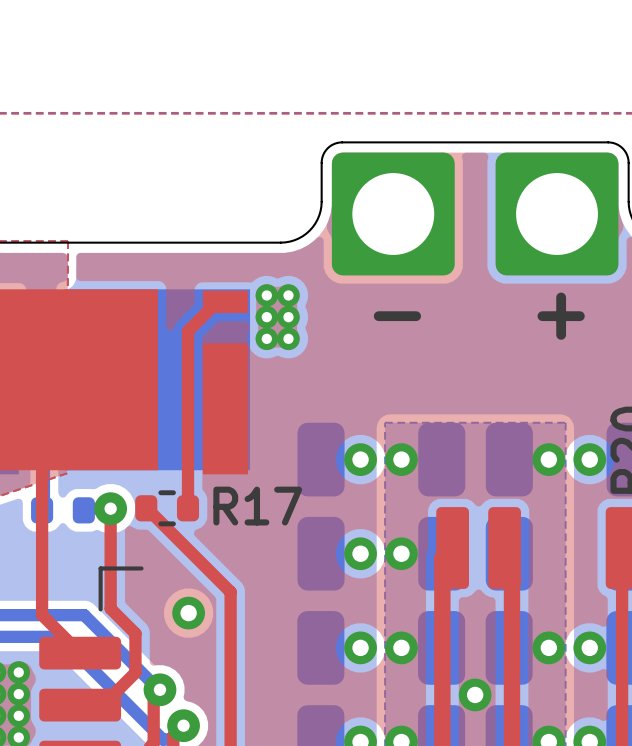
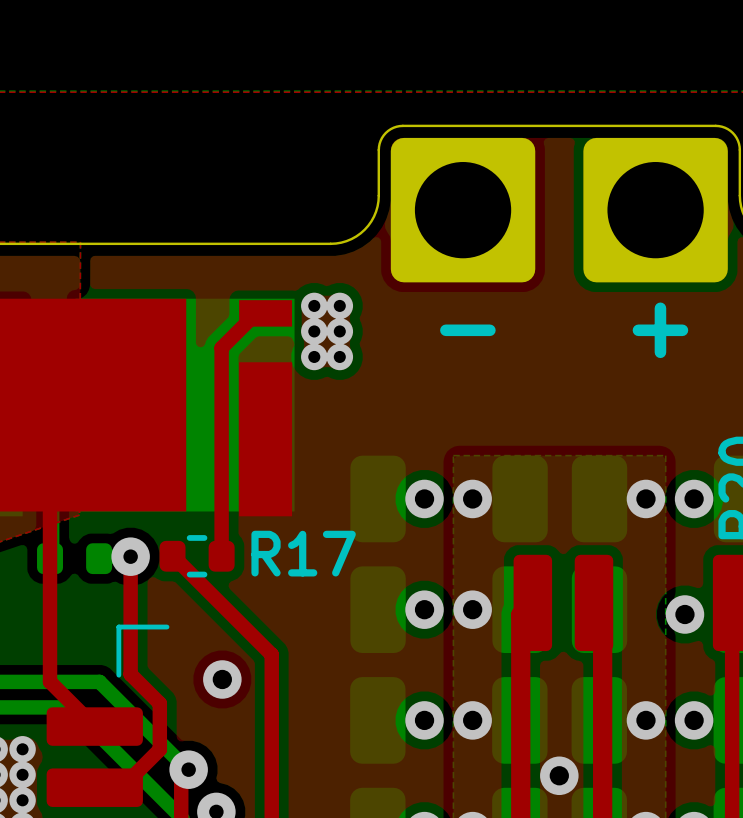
via: none -> (684, 614)

